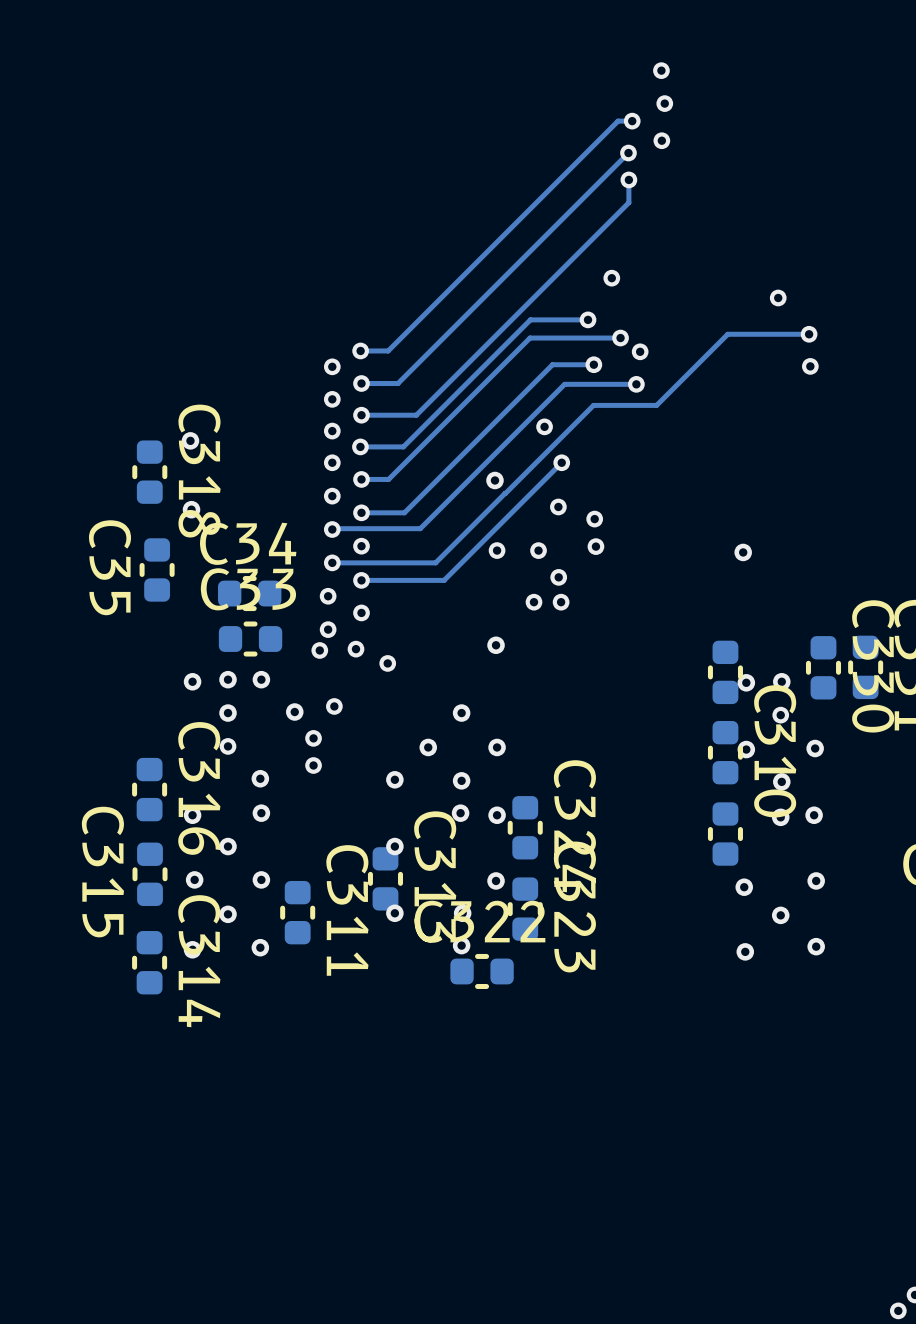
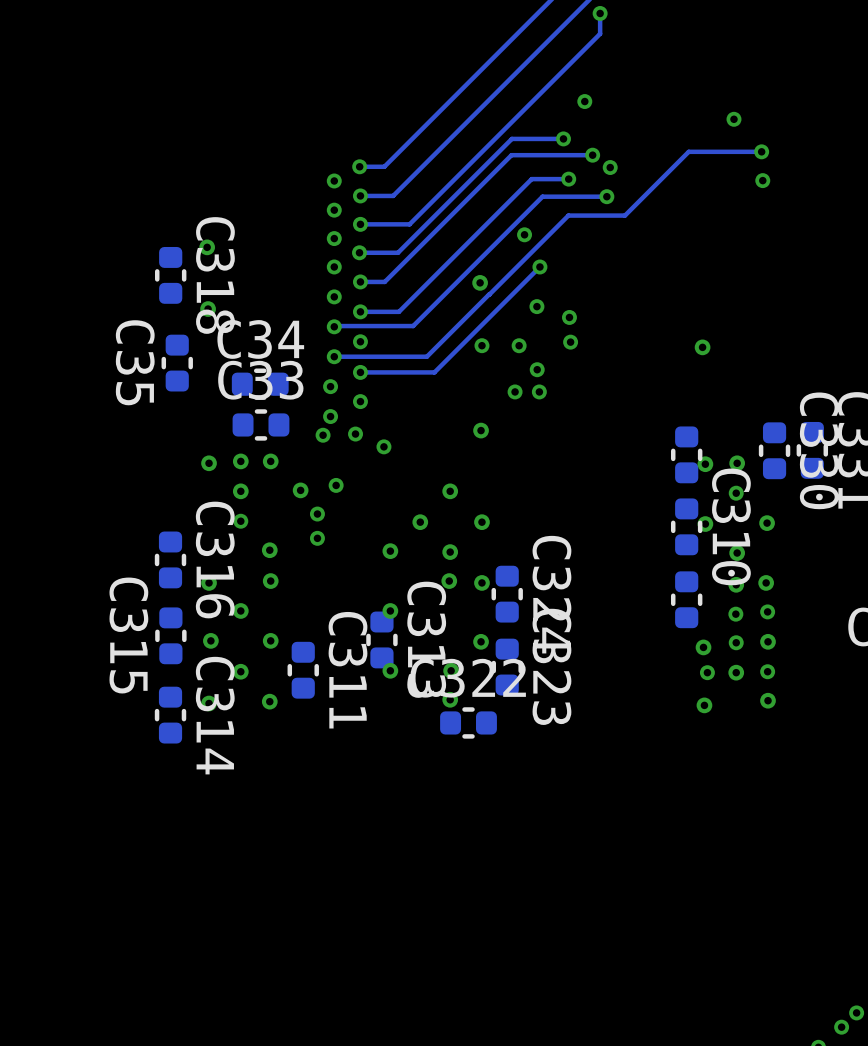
via: none -> (767, 611)
via: none -> (735, 614)
via: none -> (736, 642)
via: none -> (767, 671)
via: none -> (707, 672)

